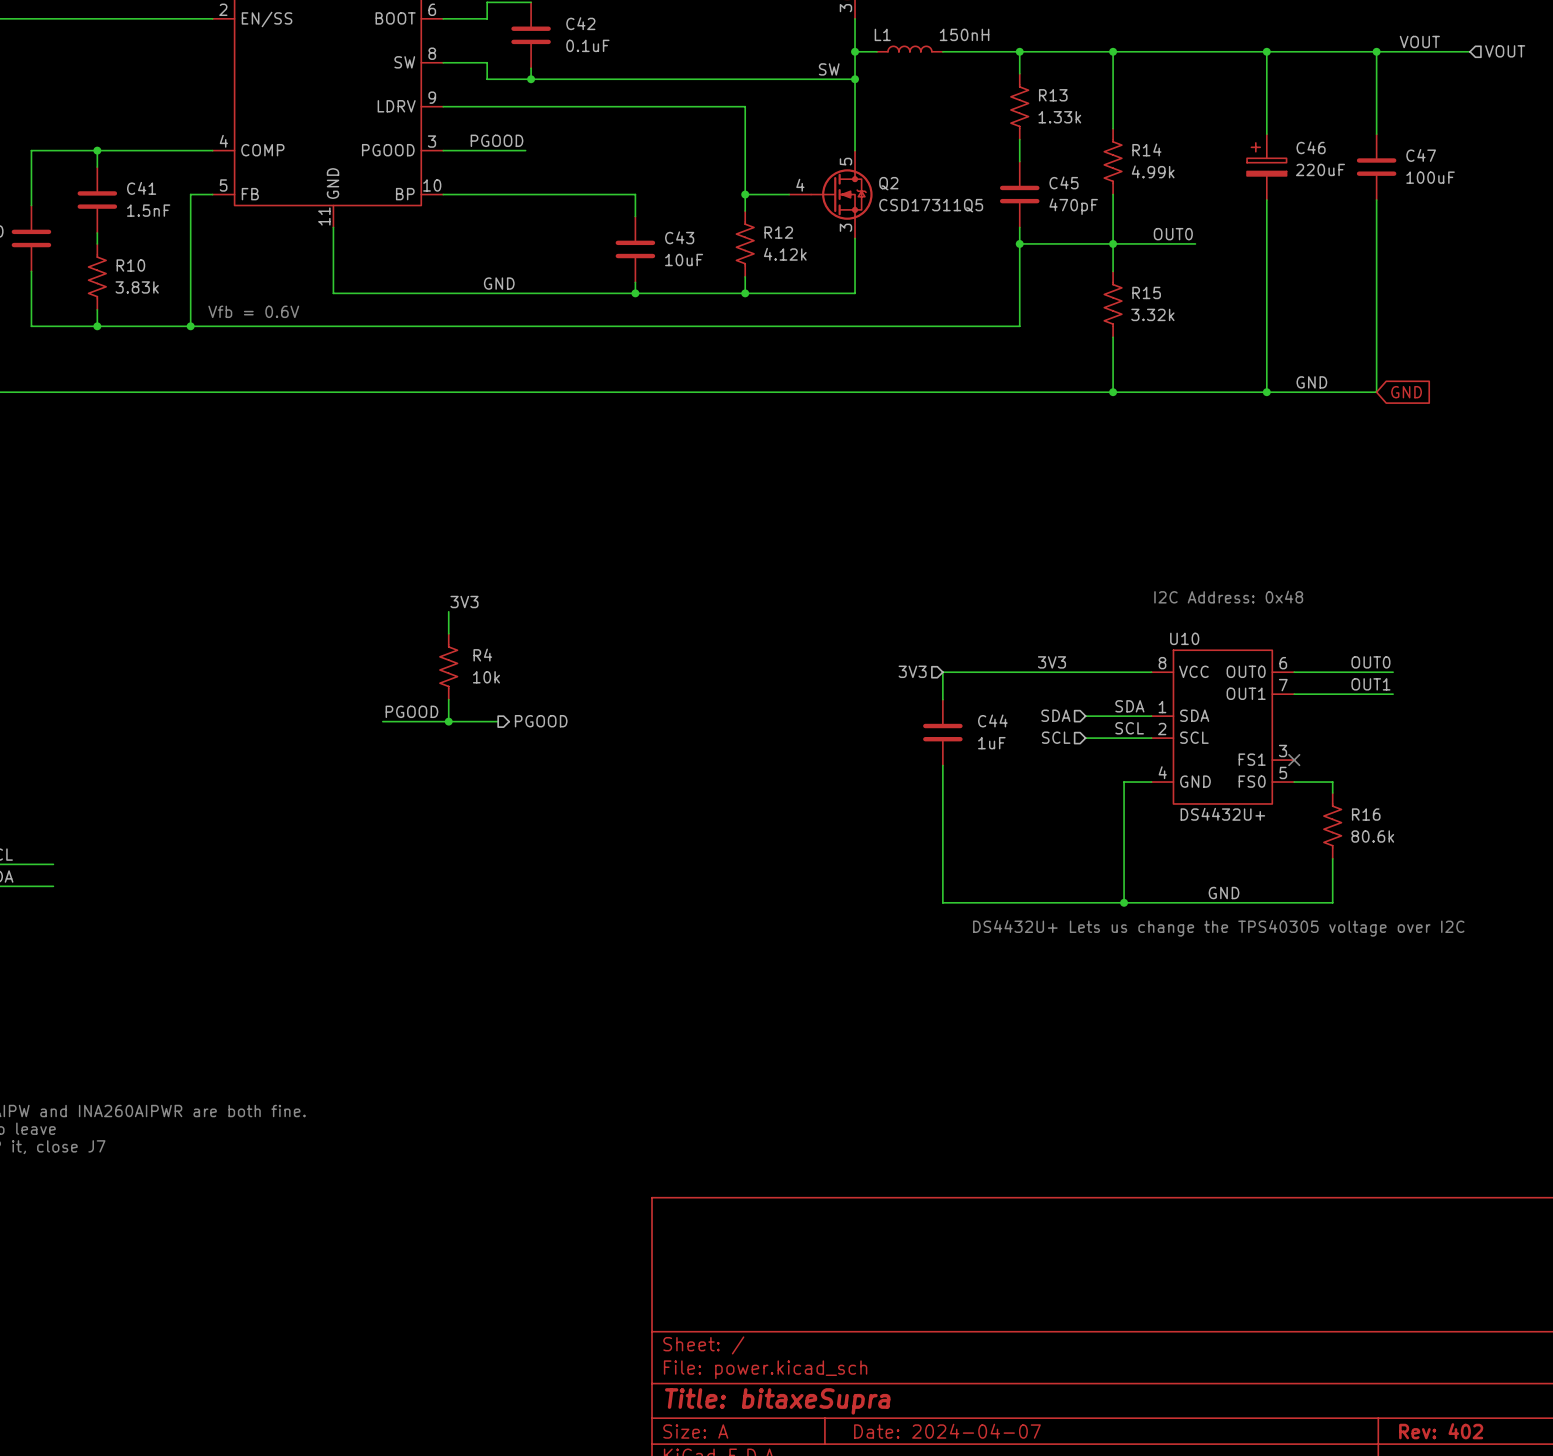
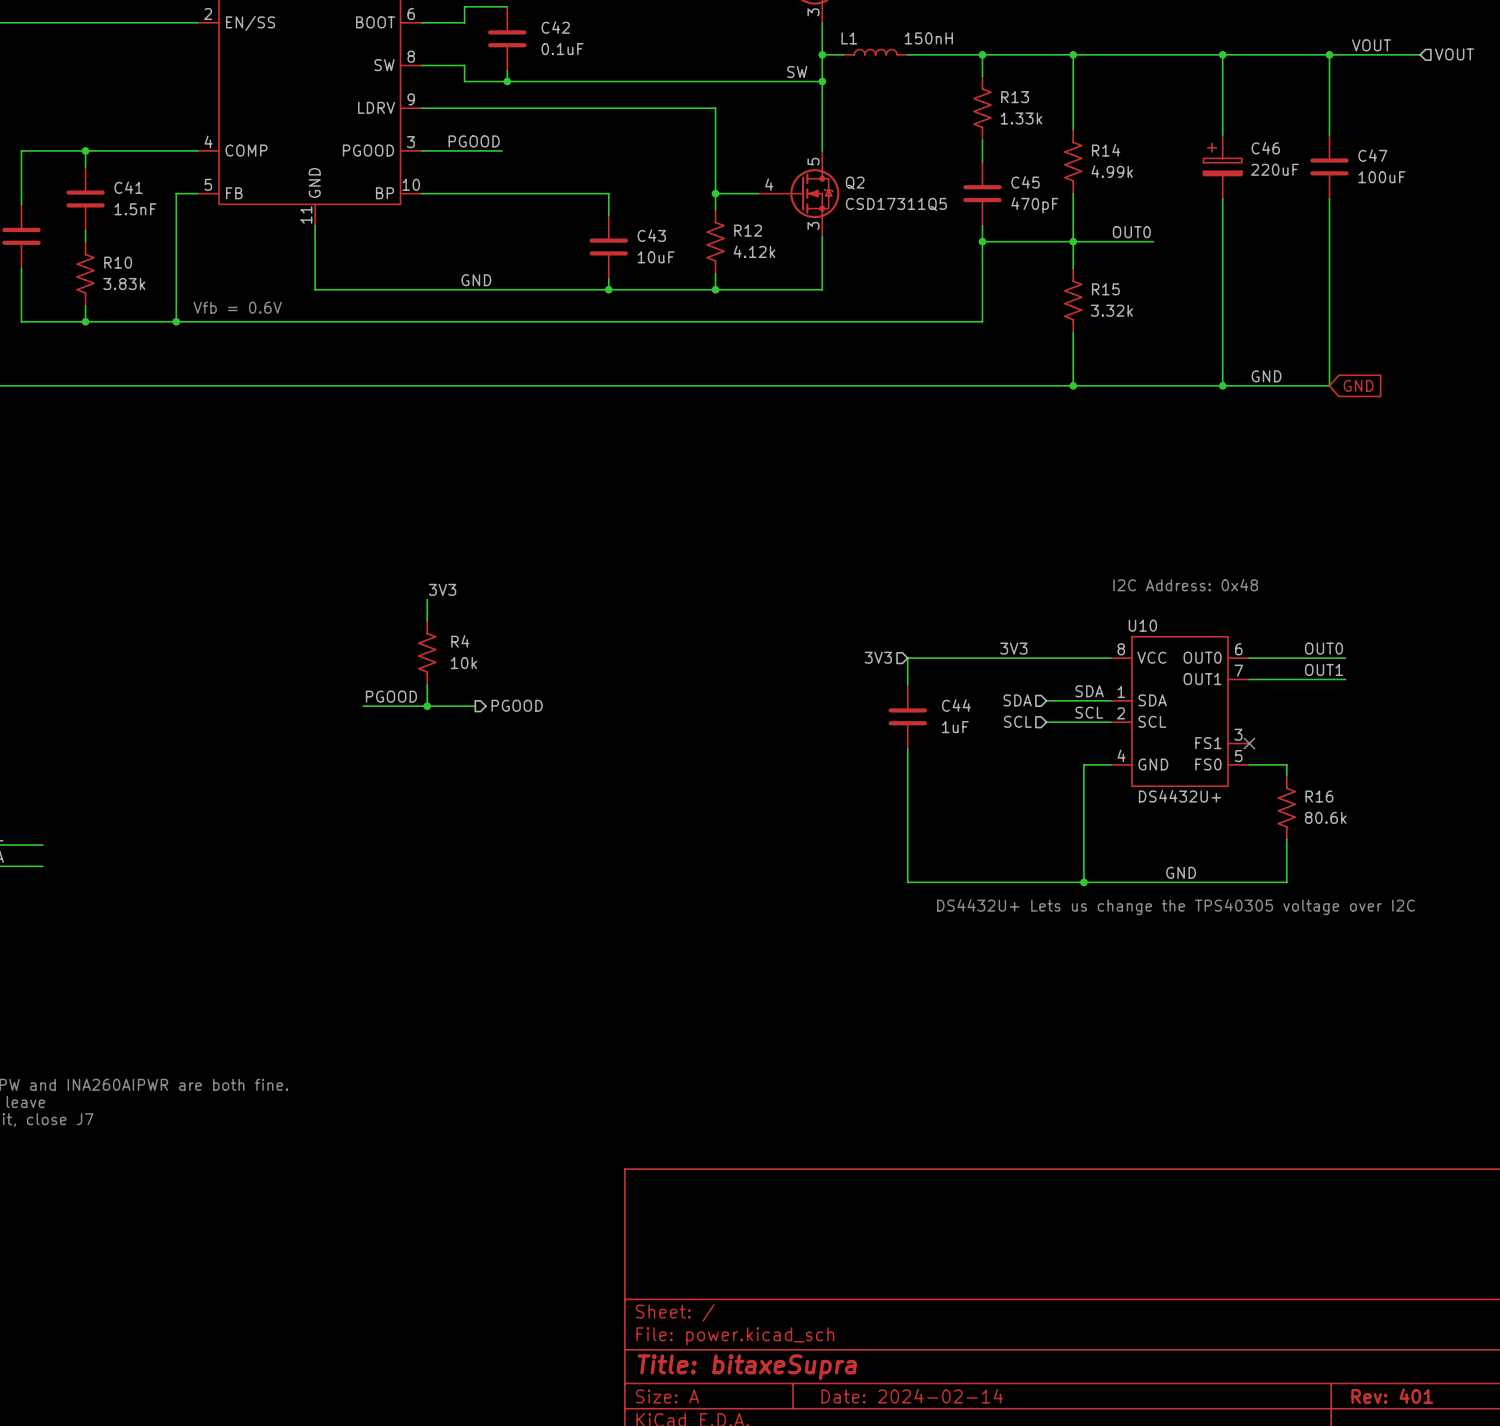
title block: Date: 2024-04-07 (947, 1431) -> Date: 2024-02-14 (912, 1396)
title block: Rev: 402 (1441, 1431) -> Rev: 401 (1392, 1396)

